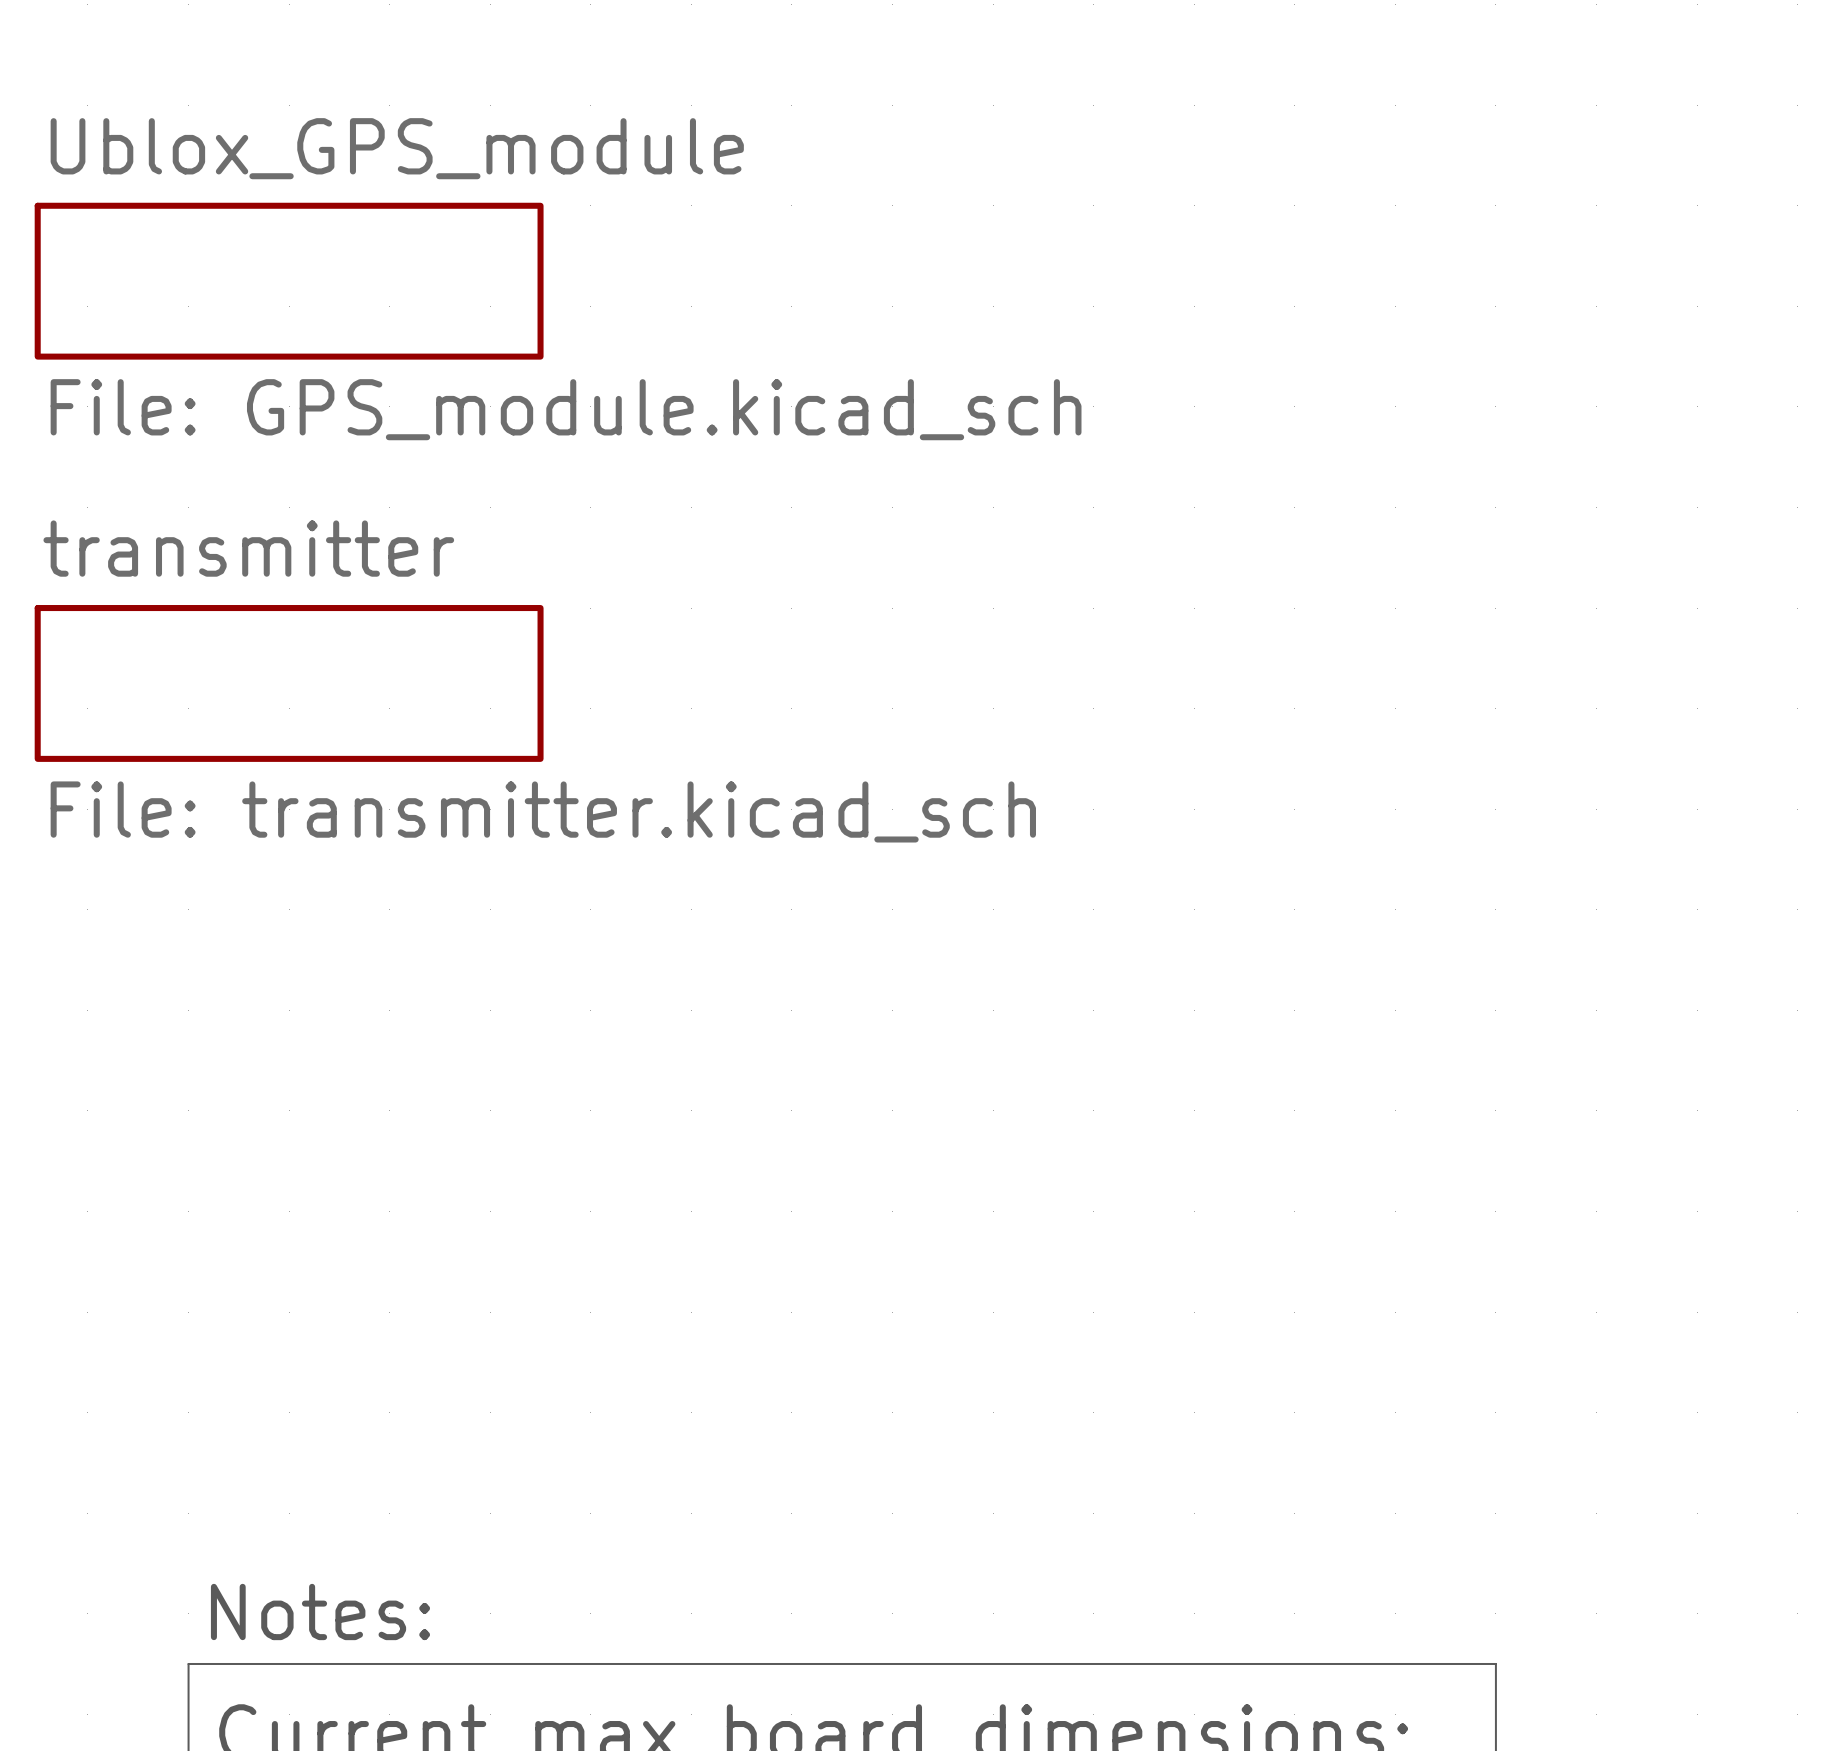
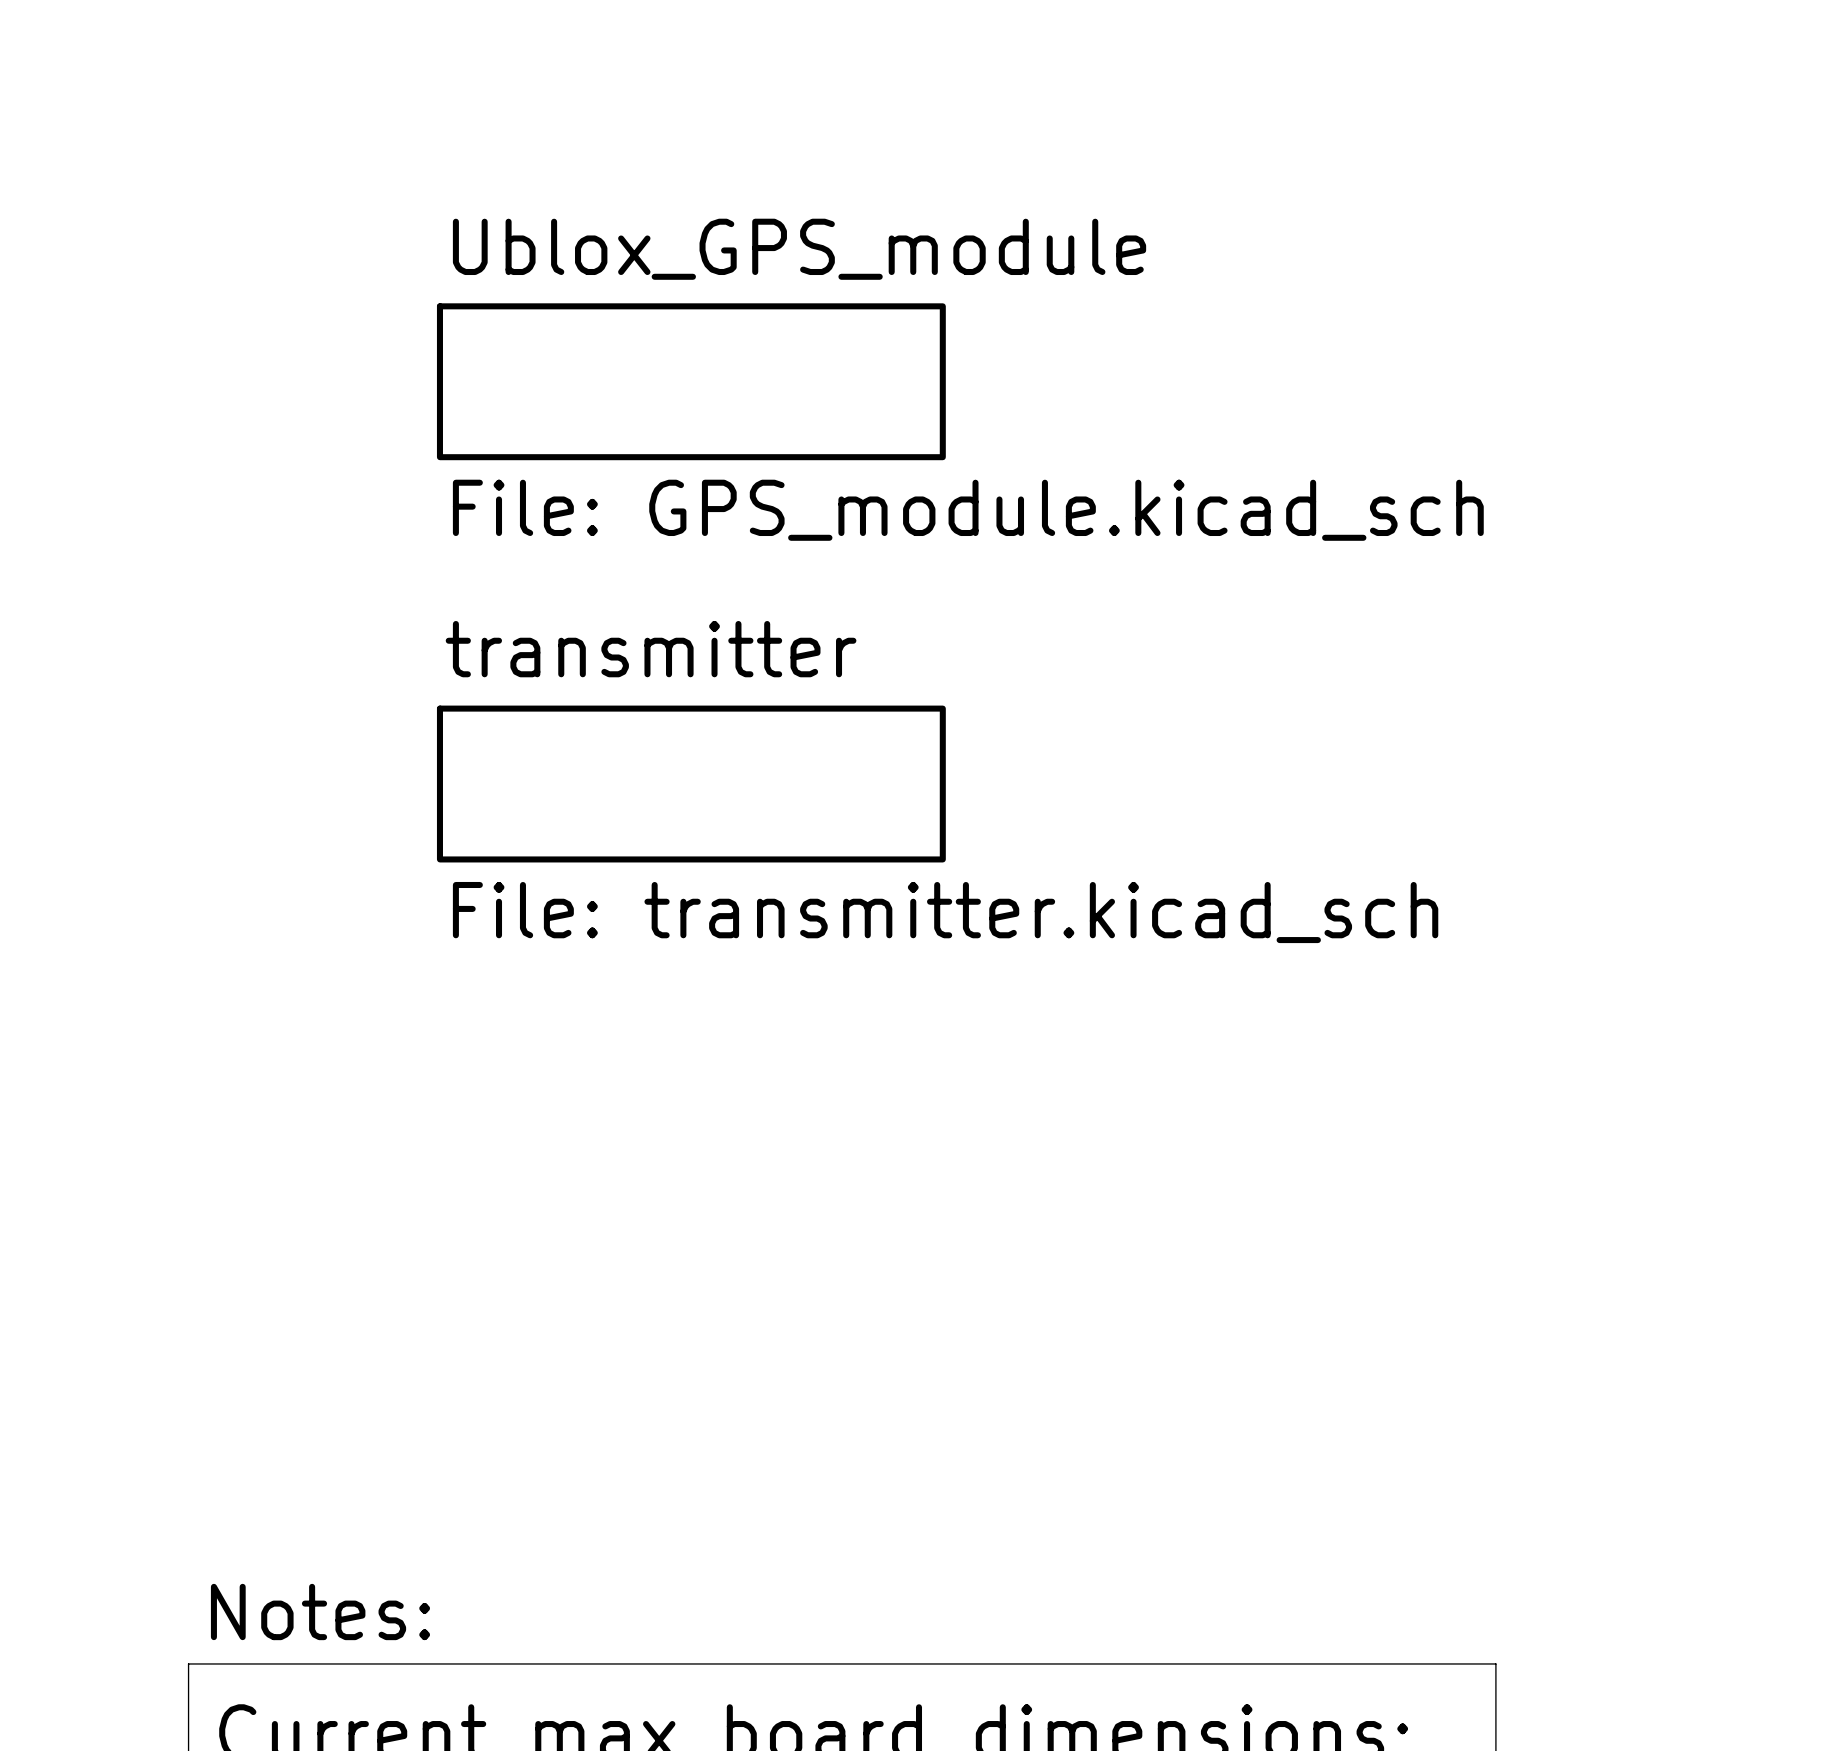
sheet Ublox_GPS_module position: (289, 281) -> (691, 381)
sheet transmitter position: (289, 683) -> (691, 784)

